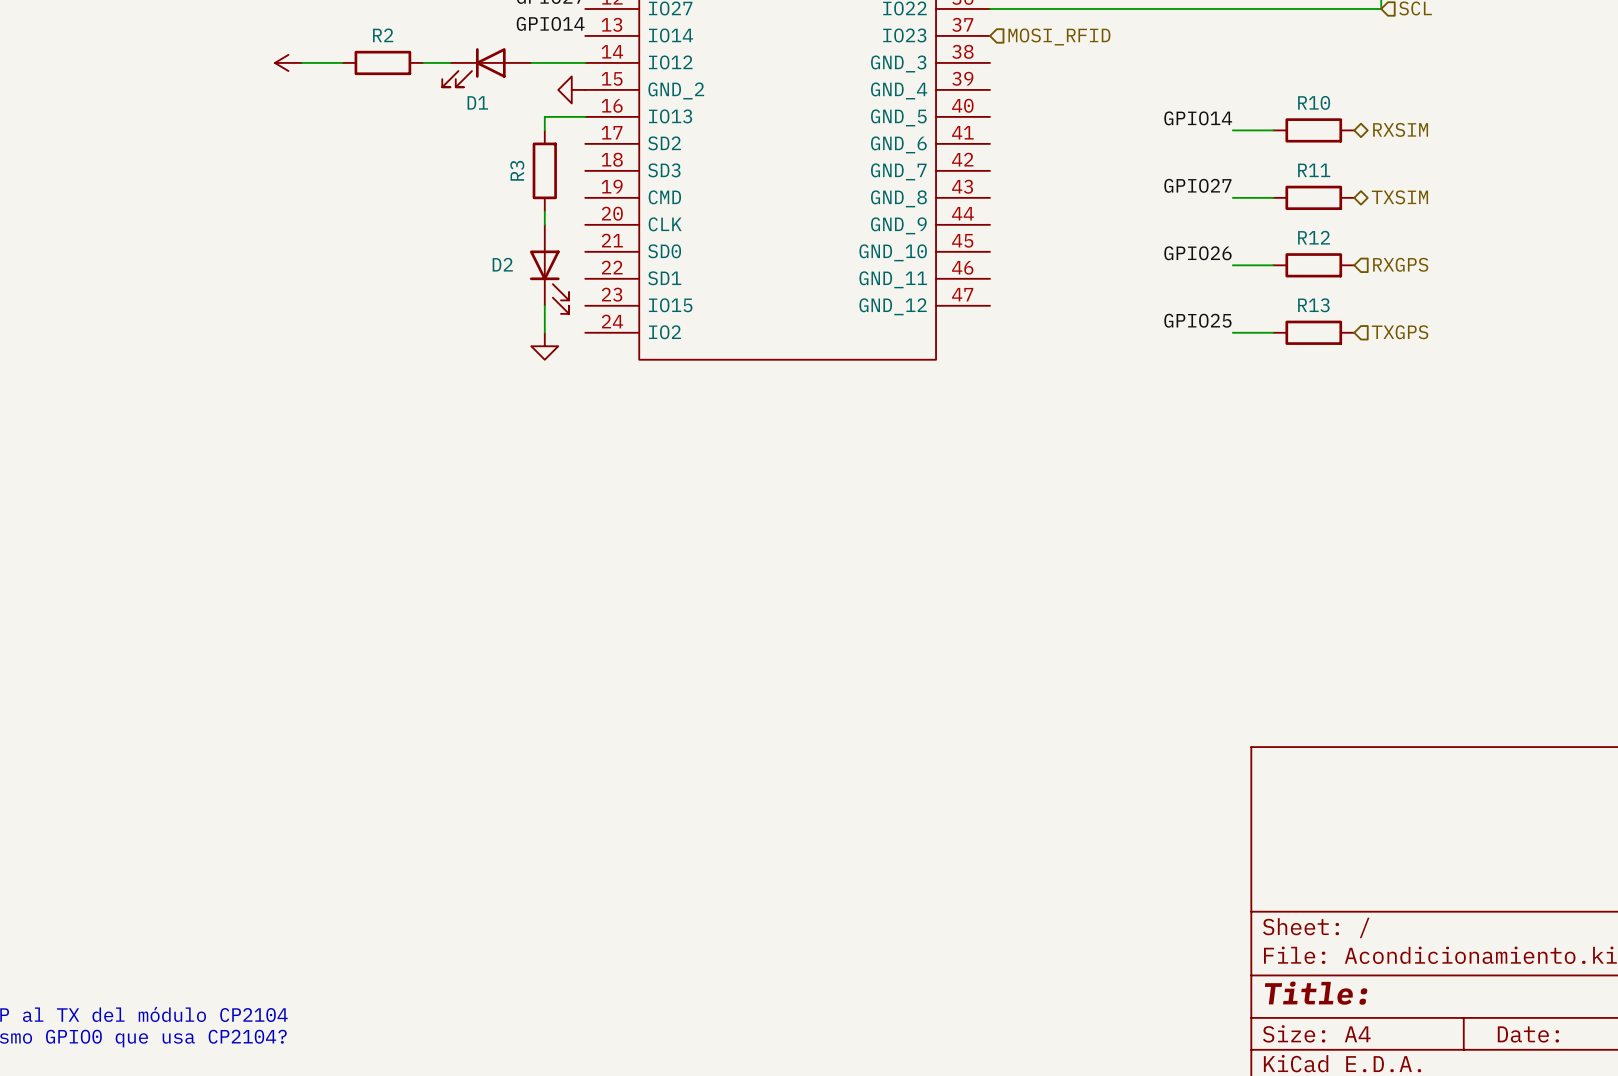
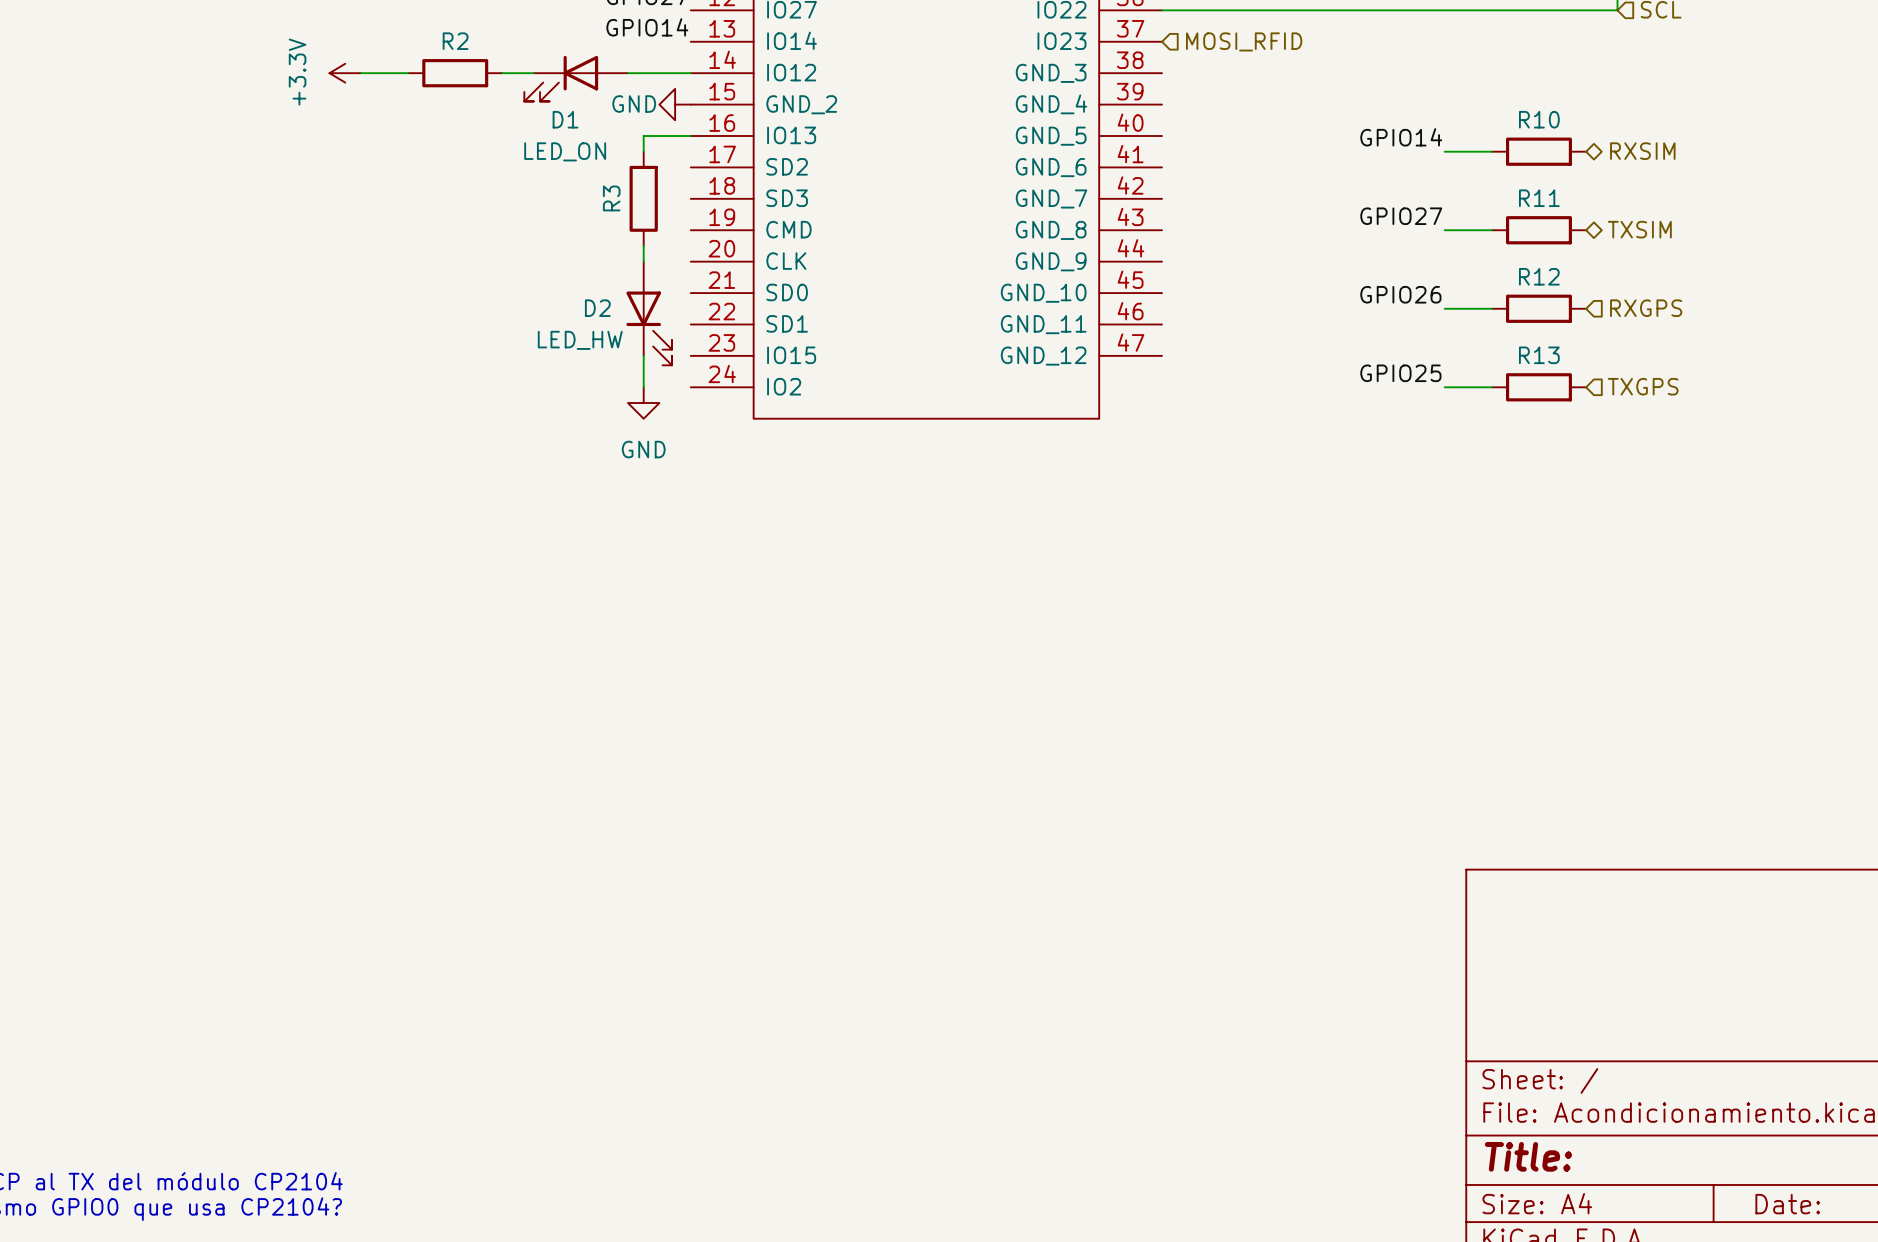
power symbol text: none -> +3.3V (297, 72)
power symbol text: none -> GND (634, 104)
D1 value: none -> LED_ON (565, 151)
D2 value: none -> LED_HW (580, 340)
power symbol text: none -> GND (643, 449)

